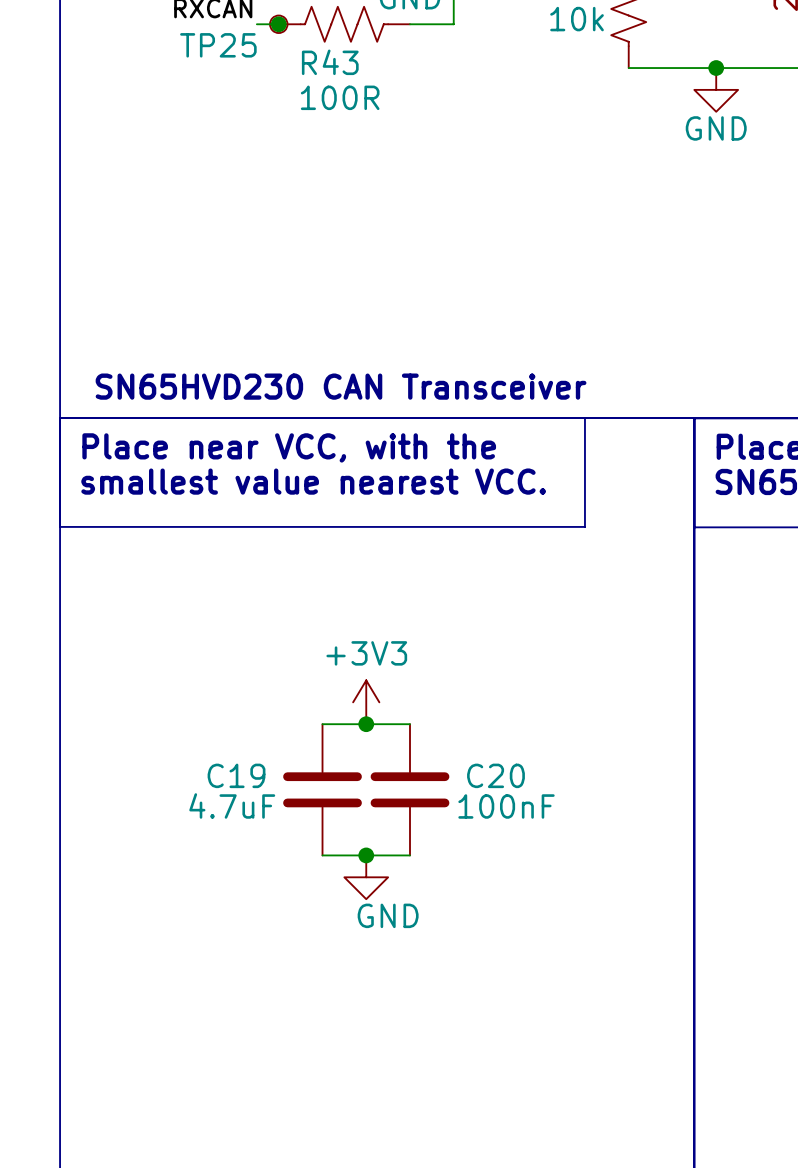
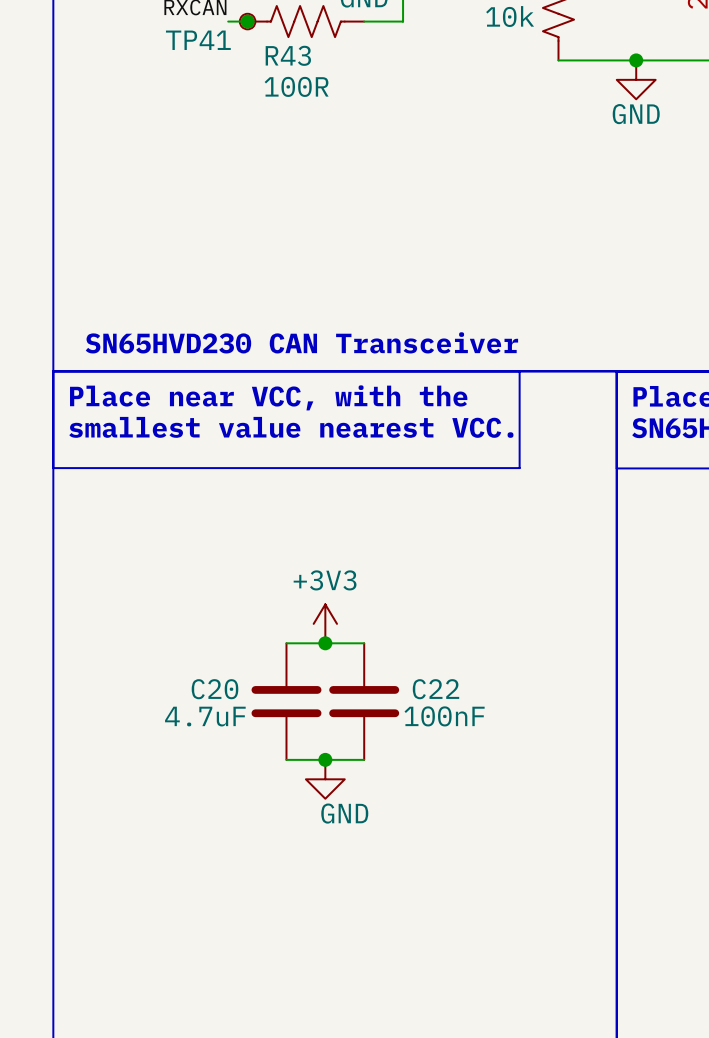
TP25 name: TP25 (218, 45) -> TP41 (198, 40)
C19 name: C19 (236, 775) -> C20 (214, 689)
C20 name: C20 (495, 775) -> C22 (435, 689)

